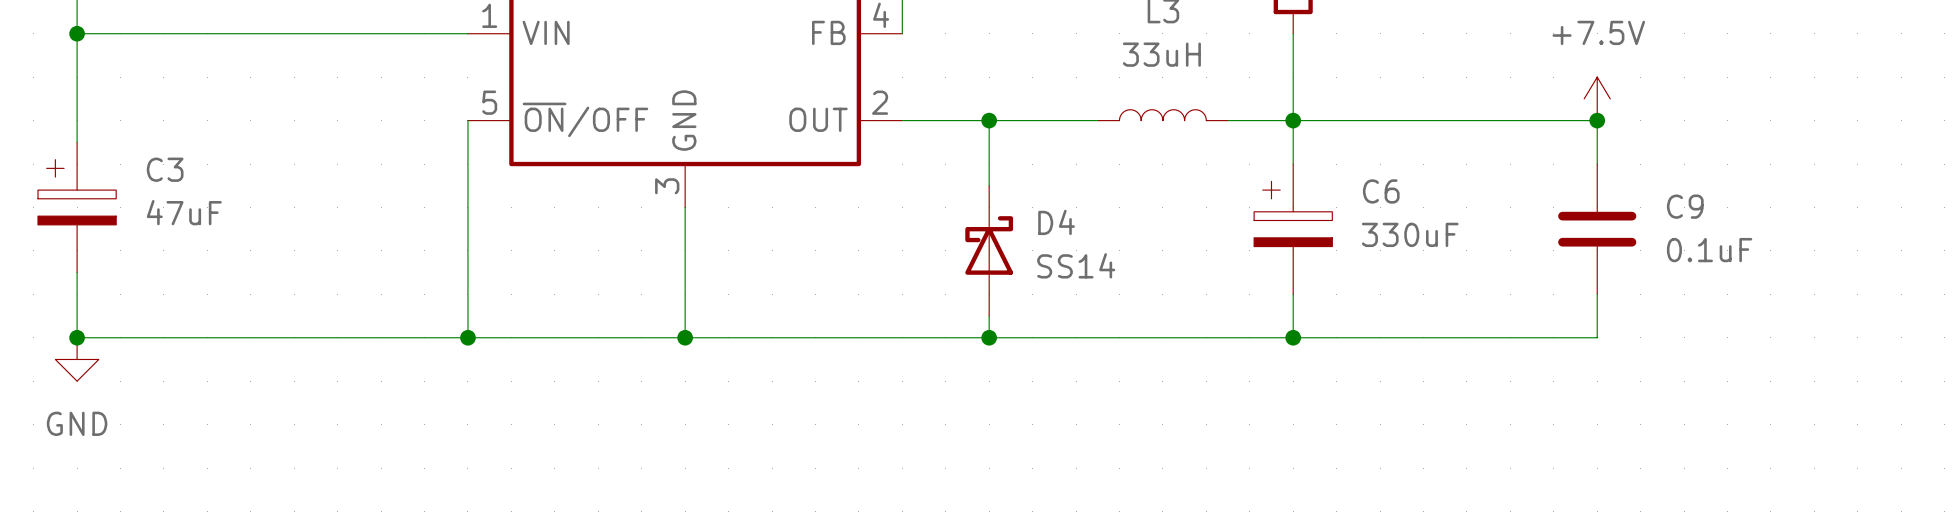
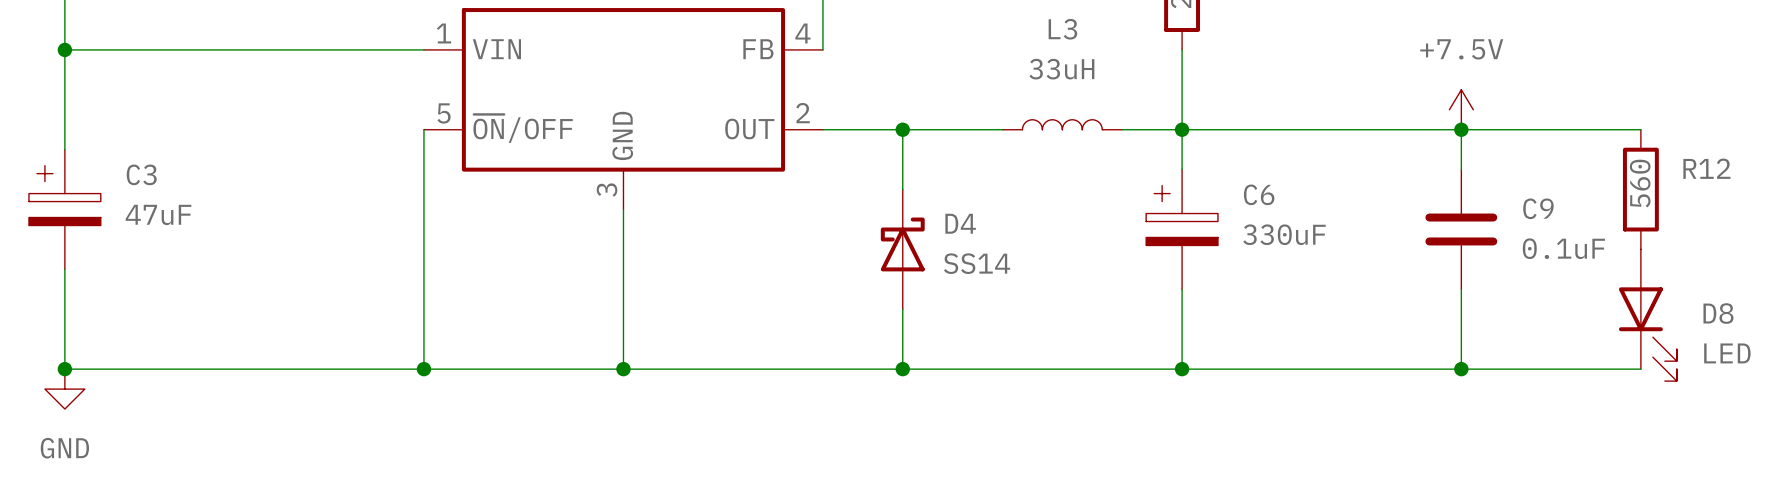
wire: none -> (1461, 129) (1640, 129)
R12: none -> 560 (1640, 189)
D8: none -> LED (1647, 315)
wire: (77, 337) (1597, 337) -> (64, 329) (64, 369) (1640, 369)
junction position: (77, 337) -> (64, 369)
wire: none -> (423, 329) (423, 369)
junction position: (467, 337) -> (423, 369)
wire: none -> (623, 329) (623, 369)
junction position: (685, 337) -> (623, 369)
wire: none -> (902, 329) (902, 369)
junction position: (989, 337) -> (902, 369)
wire: none -> (1182, 329) (1182, 369)
junction position: (1293, 337) -> (1182, 369)
wire: none -> (1461, 329) (1461, 369)
power symbol position: GND (77, 359) -> GND (64, 389)
junction: none -> (1461, 369)

